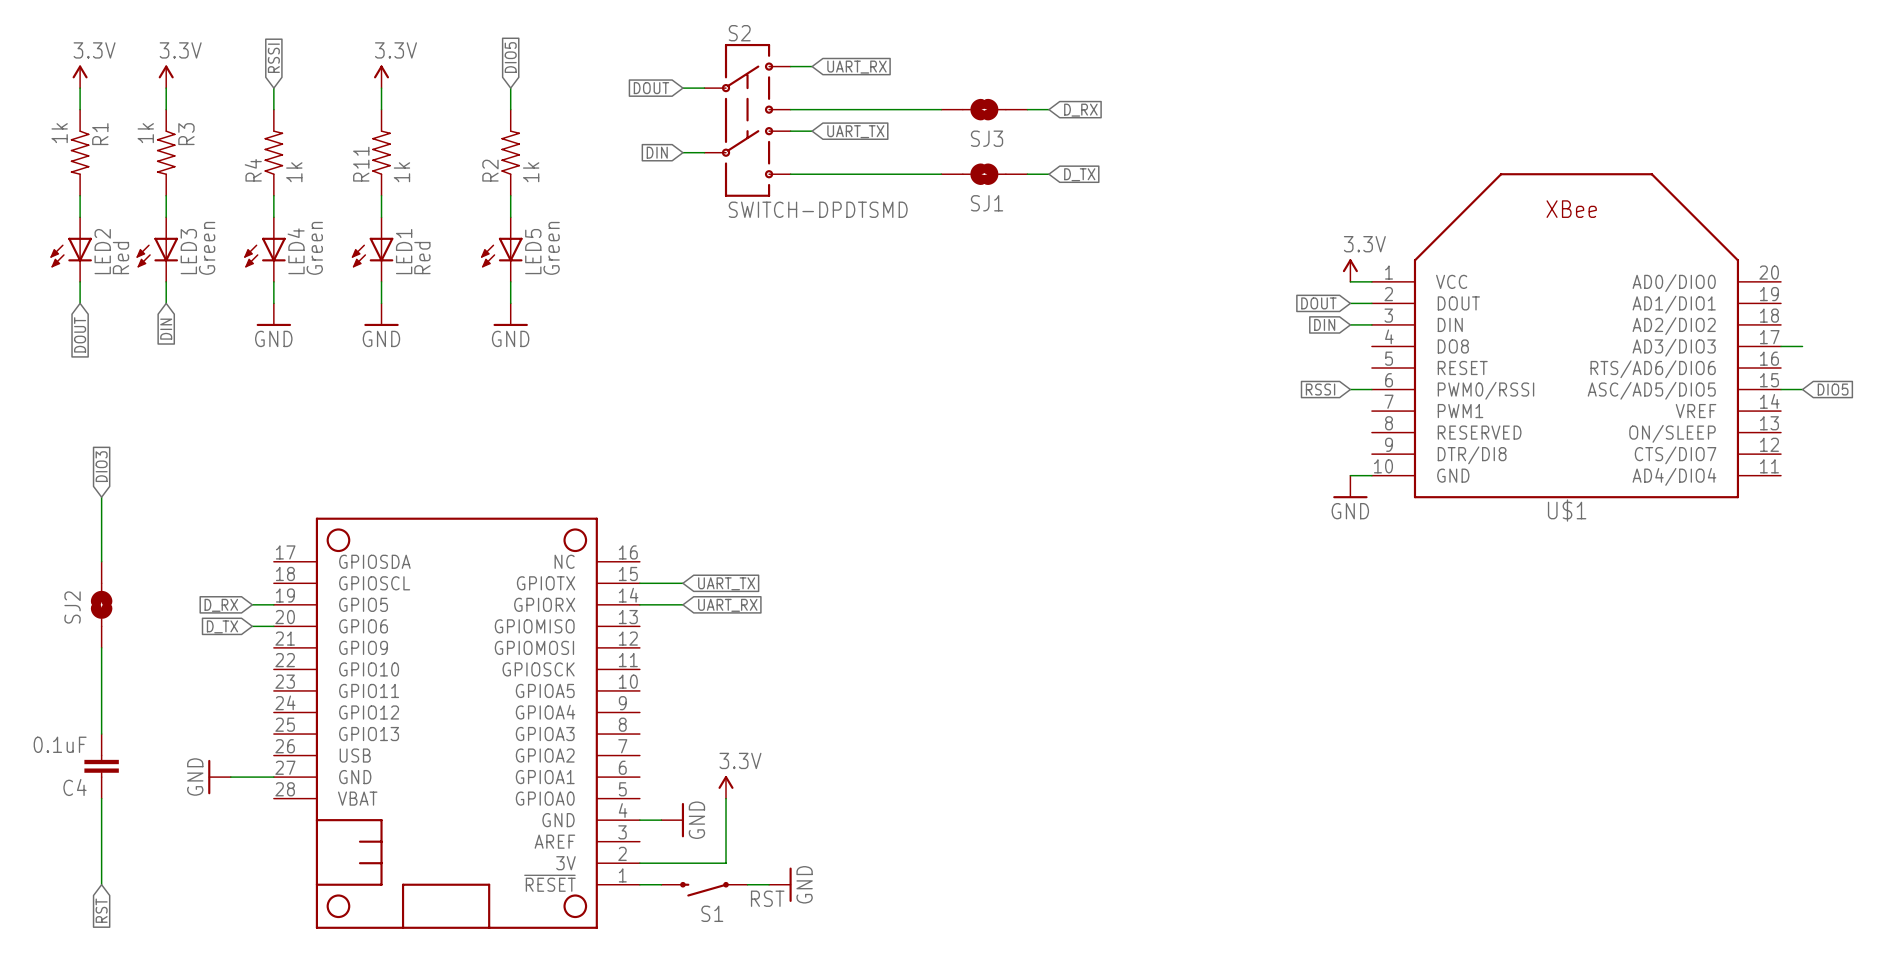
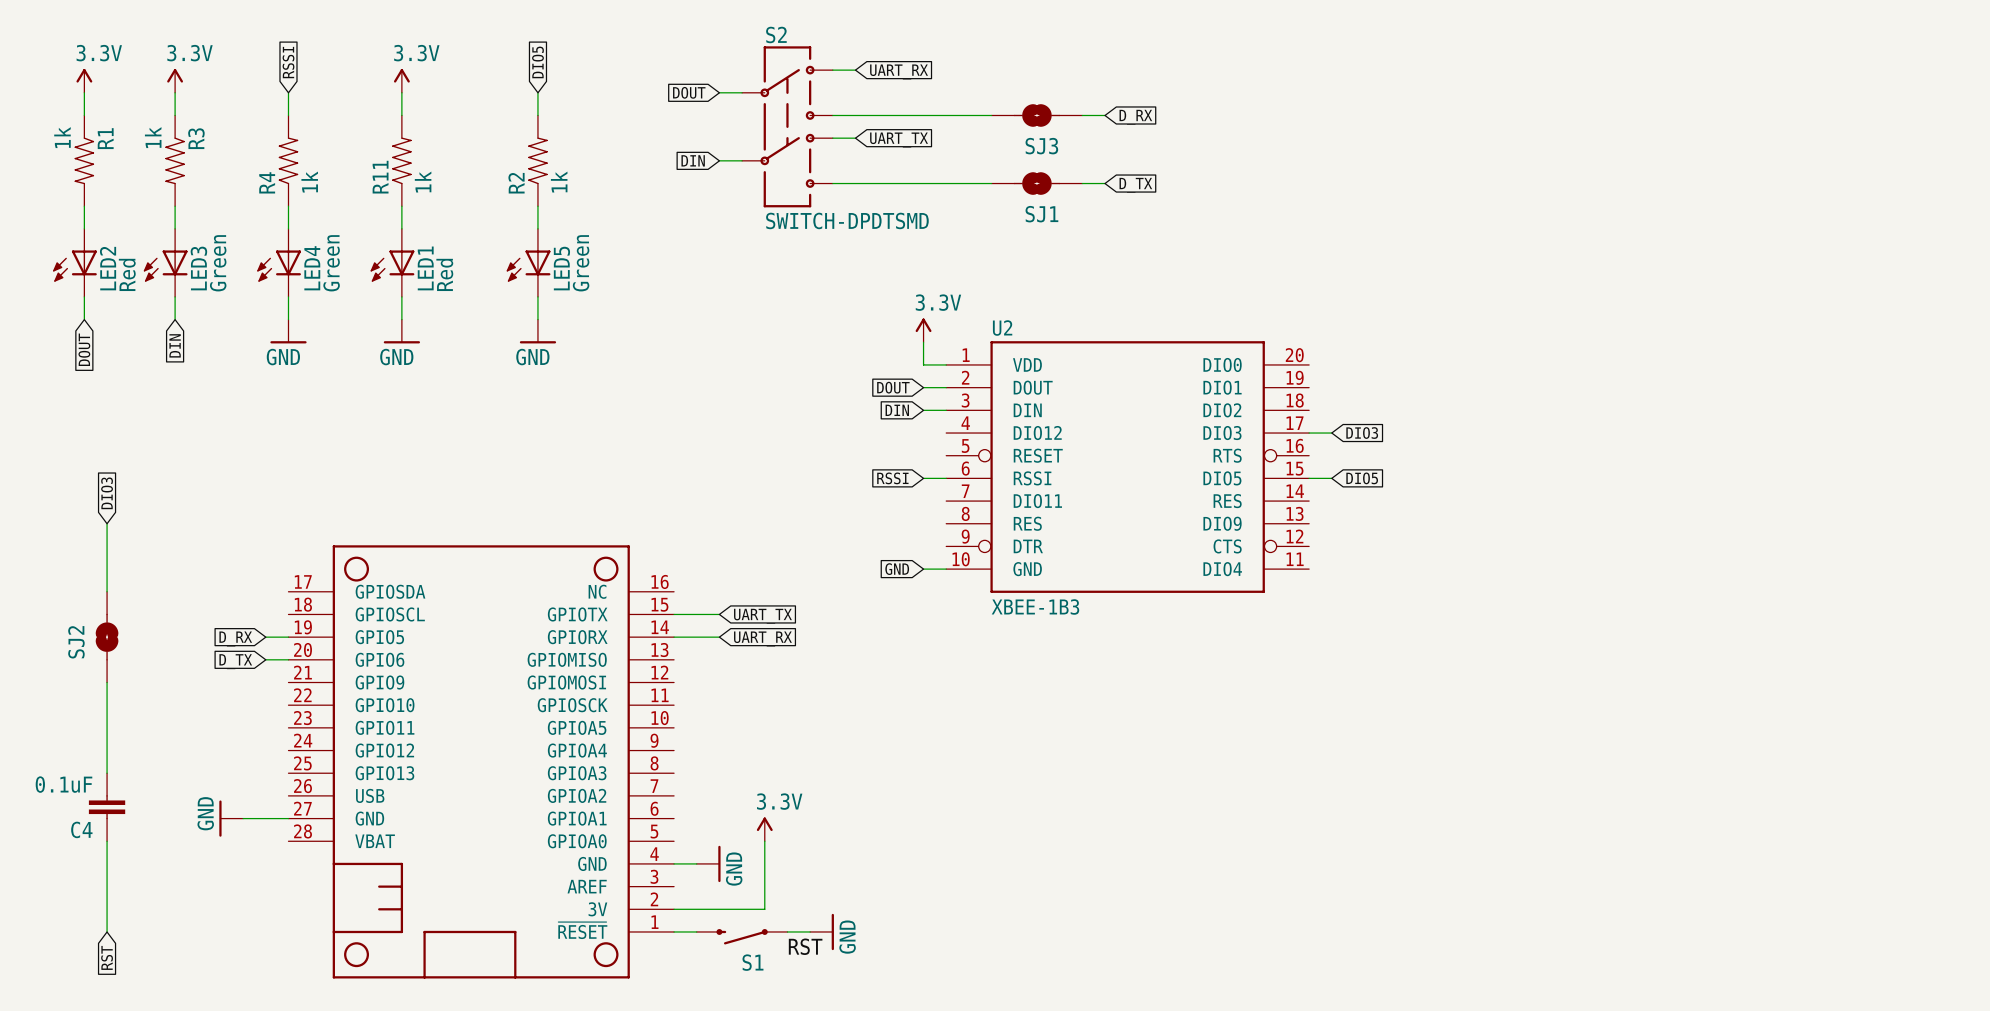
power symbol: 3.3V (1350, 270) -> none
wire: (1350, 281) (1371, 281) -> (1309, 433) (1331, 433)
global label: DOUT (1318, 303) -> none
wire: (1350, 303) (1371, 303) -> none
power symbol: none -> 3.3V (923, 330)
wire: none -> (923, 342) (923, 364) (946, 364)
global label: DIN (1324, 324) -> none
wire: (1350, 324) (1371, 324) -> (1309, 478) (1331, 478)
U$1: (1576, 335) -> none
wire: (1781, 346) (1802, 346) -> none
global label: none -> DOUT (893, 387)
wire: none -> (923, 387) (946, 387)
global label: none -> DIN (897, 410)
wire: none -> (923, 410) (946, 410)
global label: RSSI (1320, 389) -> none
wire: (1350, 389) (1371, 389) -> none
wire: (1781, 389) (1802, 389) -> none
global label: DIO5 (1833, 389) -> none
global label: none -> DIO3 (1362, 433)
U2: none -> XBEE-1B3 (1127, 467)
global label: none -> RSSI (892, 478)
wire: none -> (923, 478) (946, 478)
global label: none -> DIO5 (1362, 478)
wire: (1350, 475) (1371, 475) -> none
power symbol: GND (1350, 486) -> none
global label: none -> GND (897, 569)
wire: none -> (923, 569) (946, 569)

